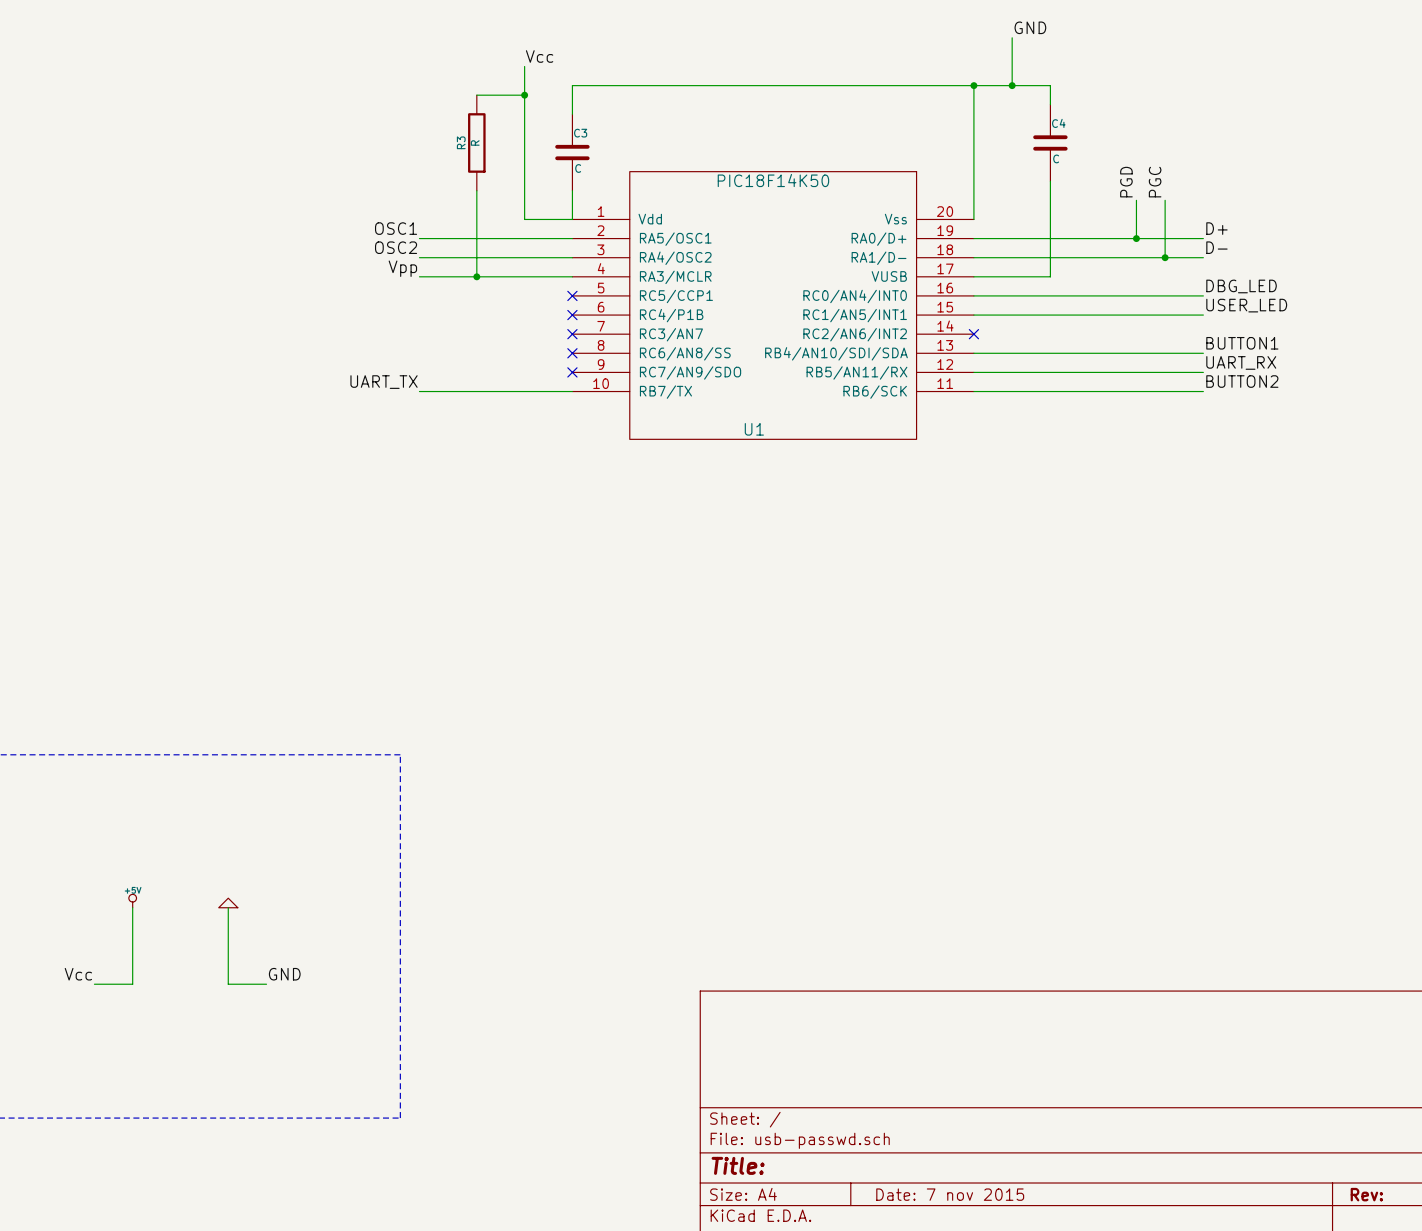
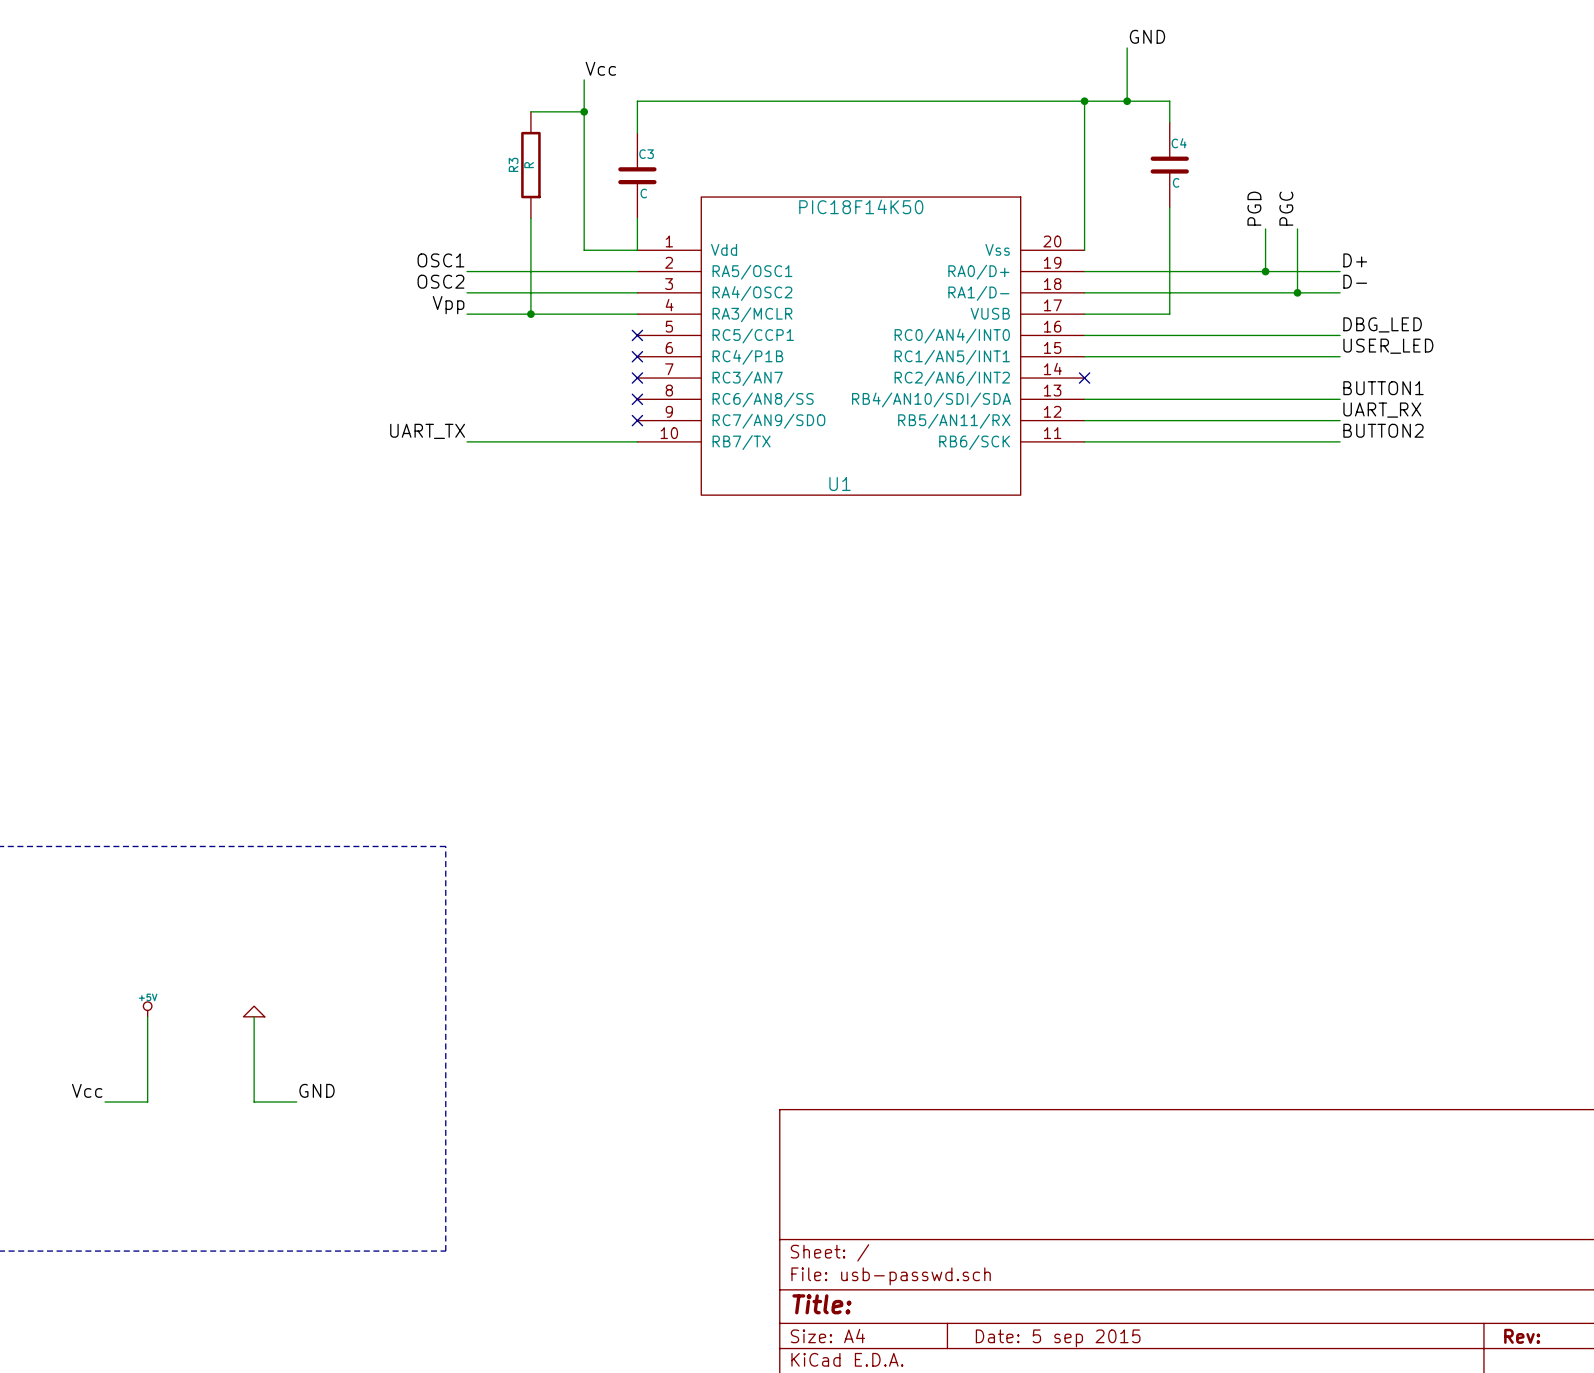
title block: Date: 7 nov 2015 (950, 1194) -> Date: 5 sep 2015 (1058, 1338)

